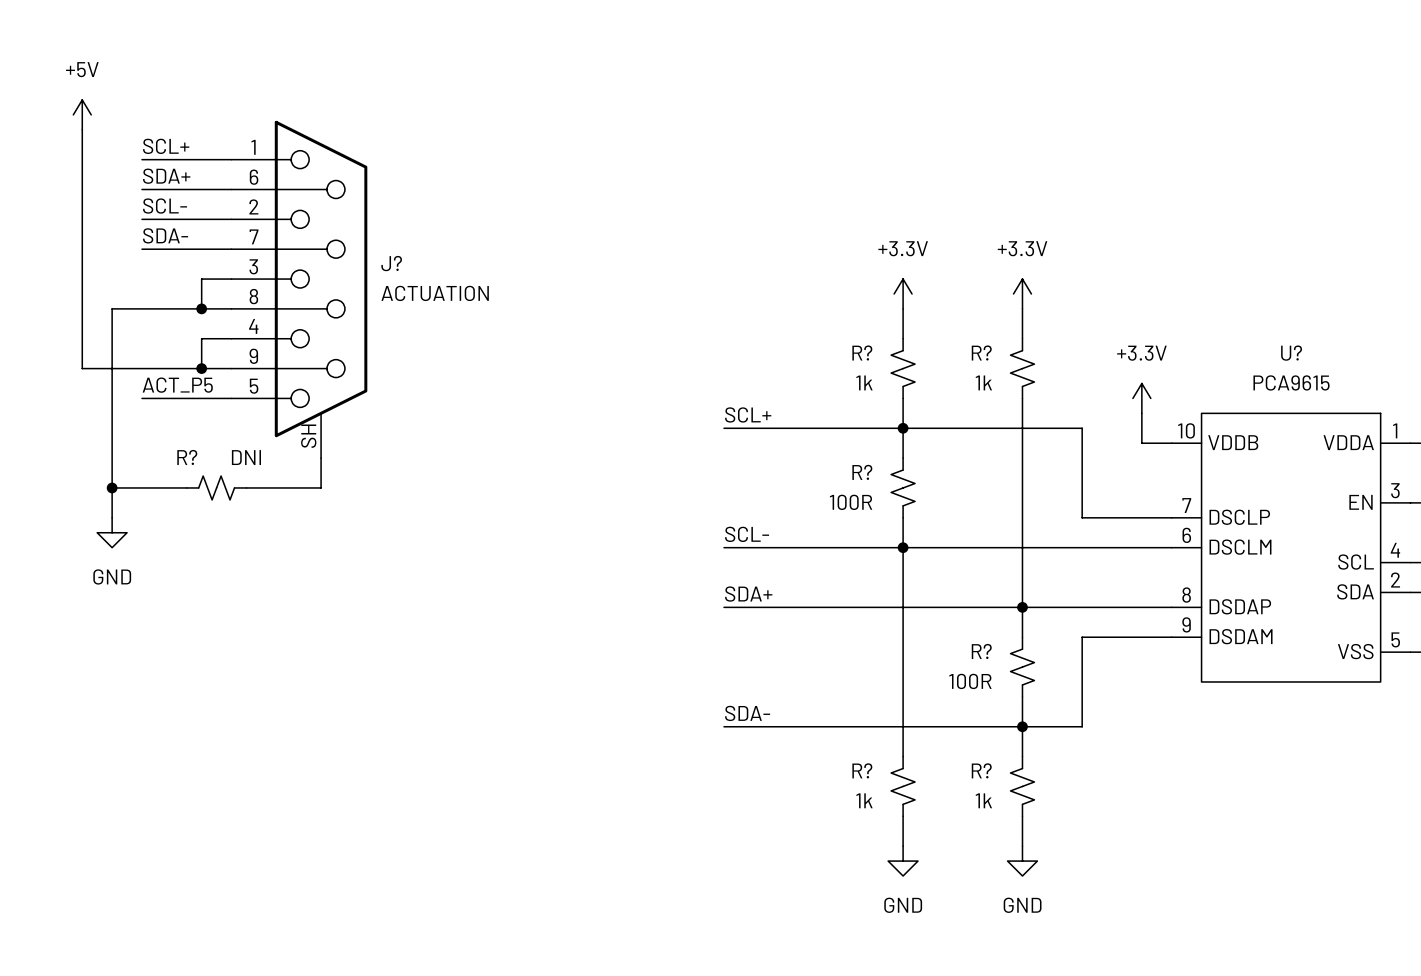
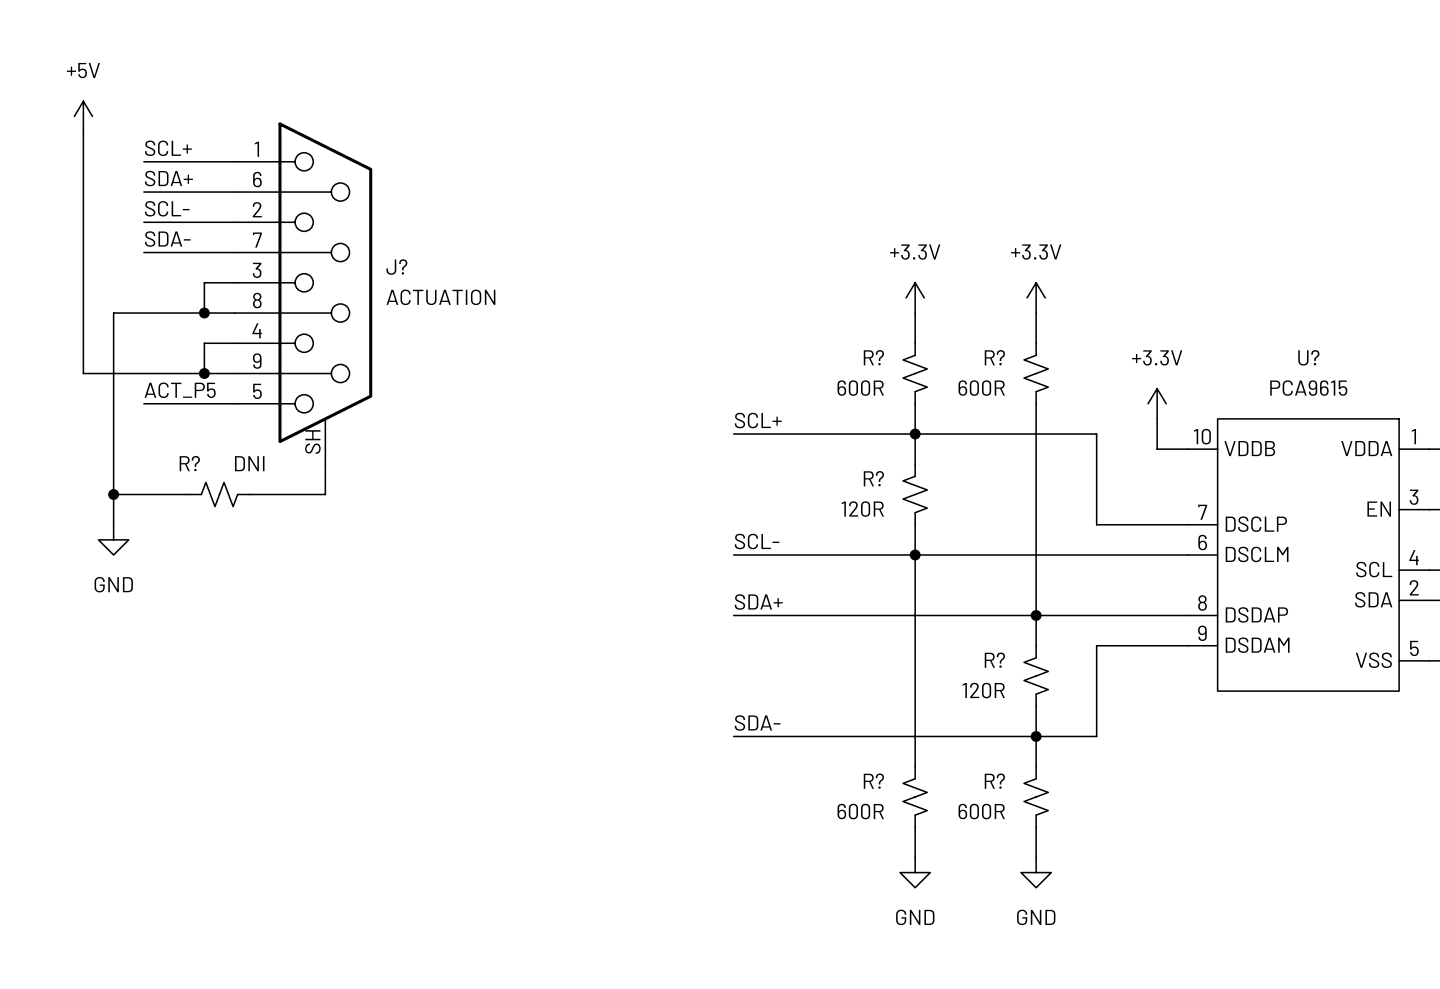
R? value: 1k (864, 382) -> 600R (860, 388)
R? value: 1k (983, 382) -> 600R (981, 388)
R? value: 100R (851, 502) -> 120R (862, 509)
R? value: 100R (970, 681) -> 120R (983, 690)
R? value: 1k (864, 800) -> 600R (860, 811)
R? value: 1k (983, 800) -> 600R (981, 811)

